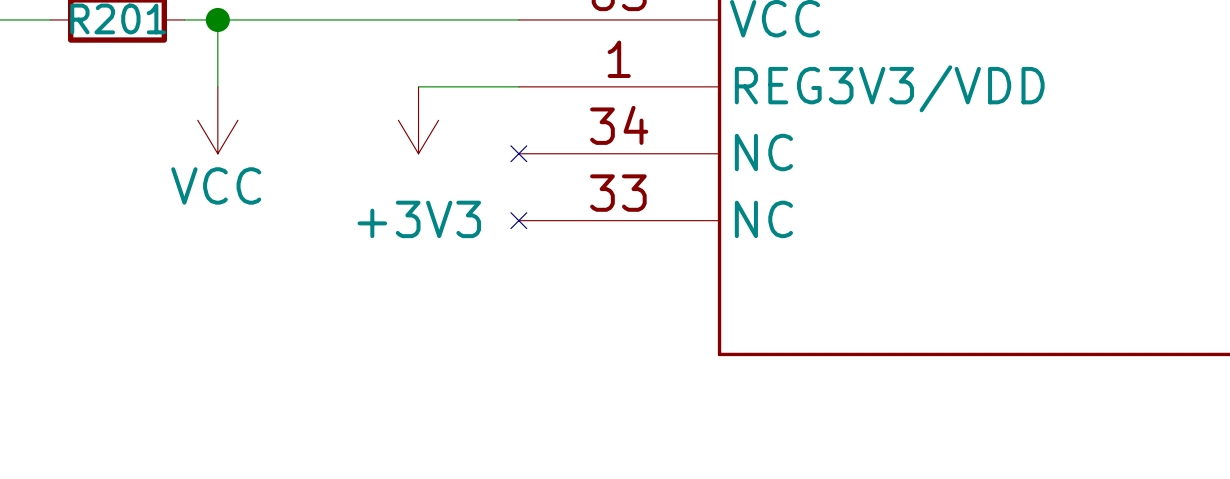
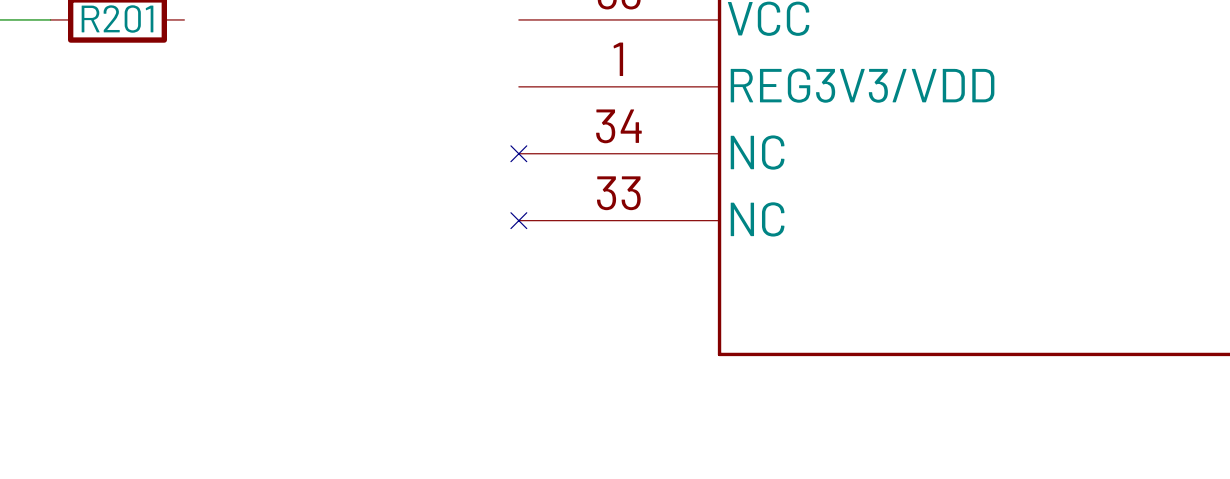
wire: (184, 19) (518, 19) -> none
wire: (217, 19) (217, 86) -> none
junction: (217, 19) -> none
wire: (418, 86) (518, 86) -> none
power symbol: VCC (217, 120) -> none
power symbol: +3V3 (418, 120) -> none

